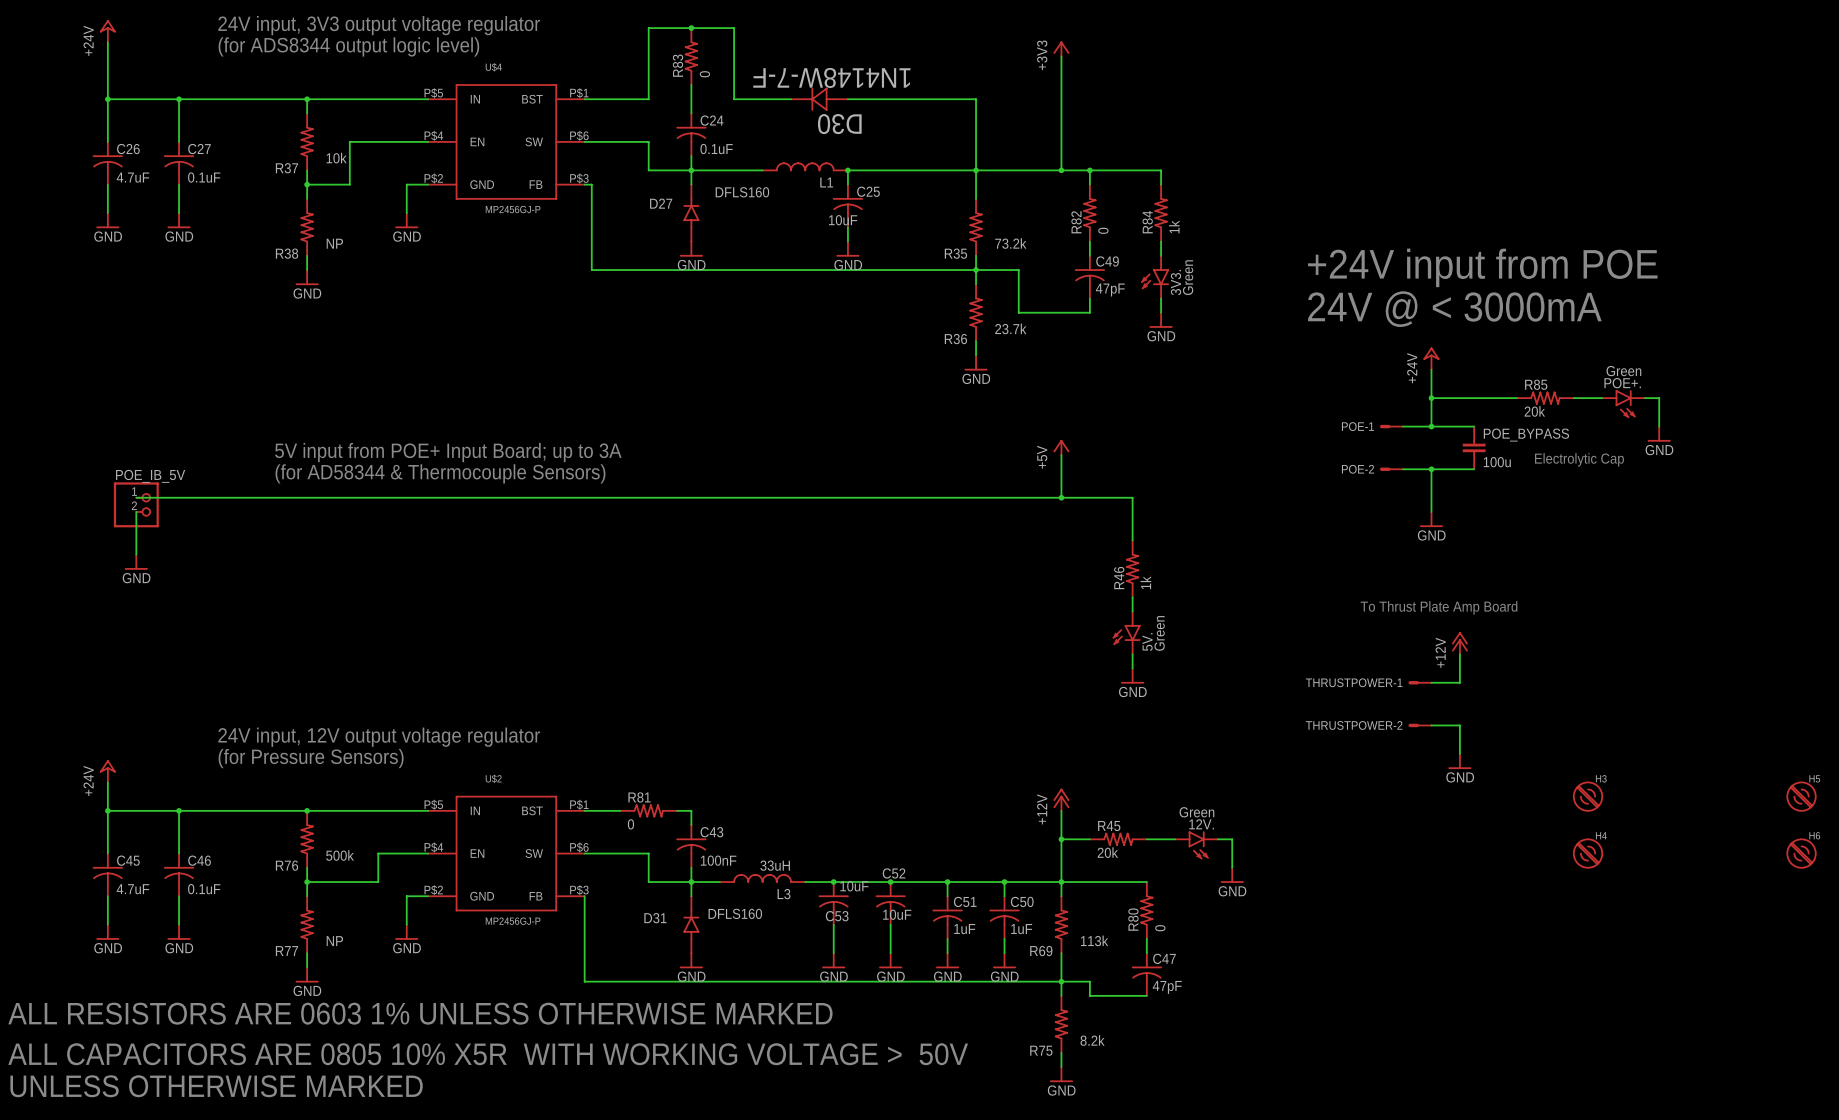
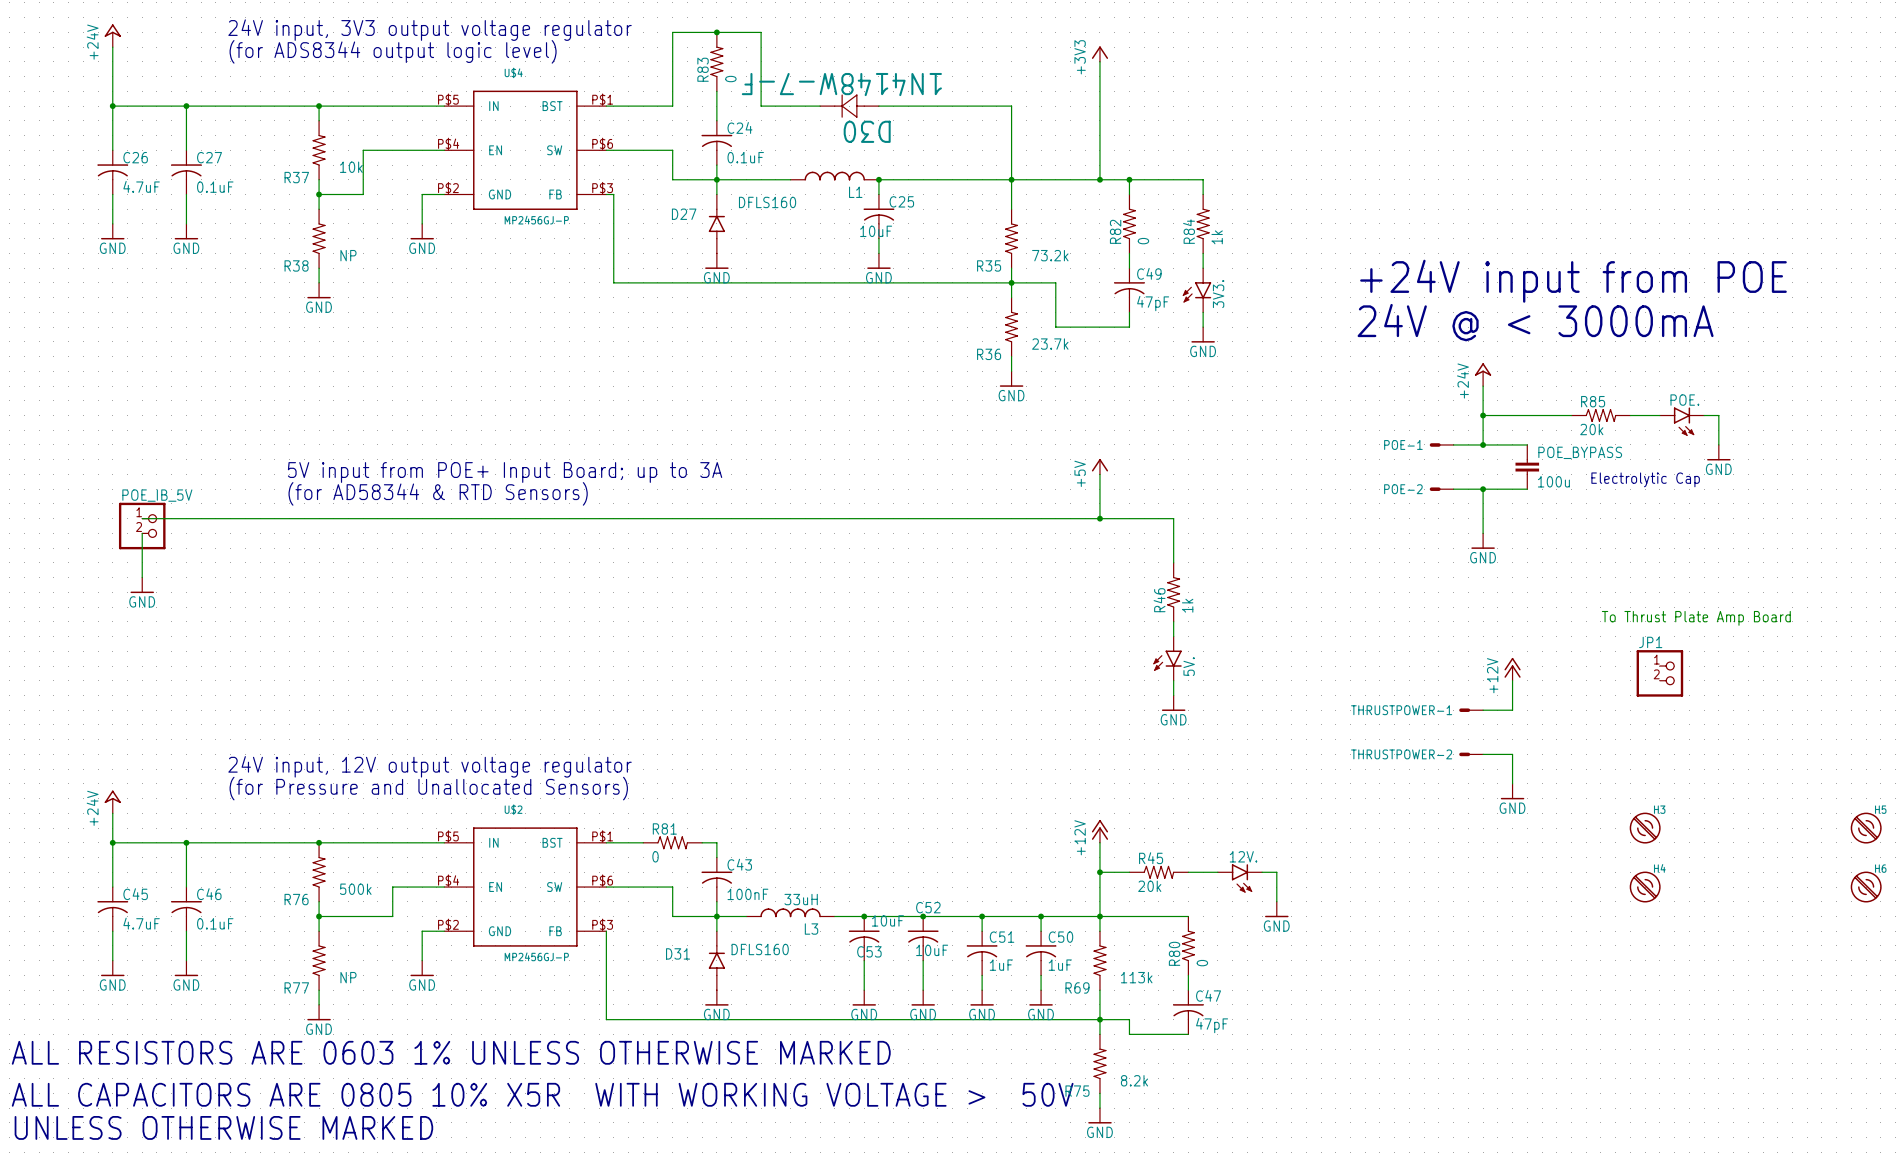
3V3. value: Green (1188, 277) -> none
POE+. value: Green (1623, 371) -> none
POE+. name: POE+. (1622, 383) -> POE. (1684, 400)
text: (for AD58344 & Thermocouple Sensors) (440, 473) -> (for AD58344 & RTD Sensors) (438, 493)
text: none -> To Thrust Plate Amp Board (1696, 618)
text: To Thrust Plate Amp Board (1439, 607) -> none
5V. value: Green (1159, 633) -> none
JP1: none -> (1659, 673)
text: (for Pressure Sensors) (311, 758) -> (for Pressure and Unallocated Sensors) (428, 788)
12V. value: Green (1196, 812) -> none

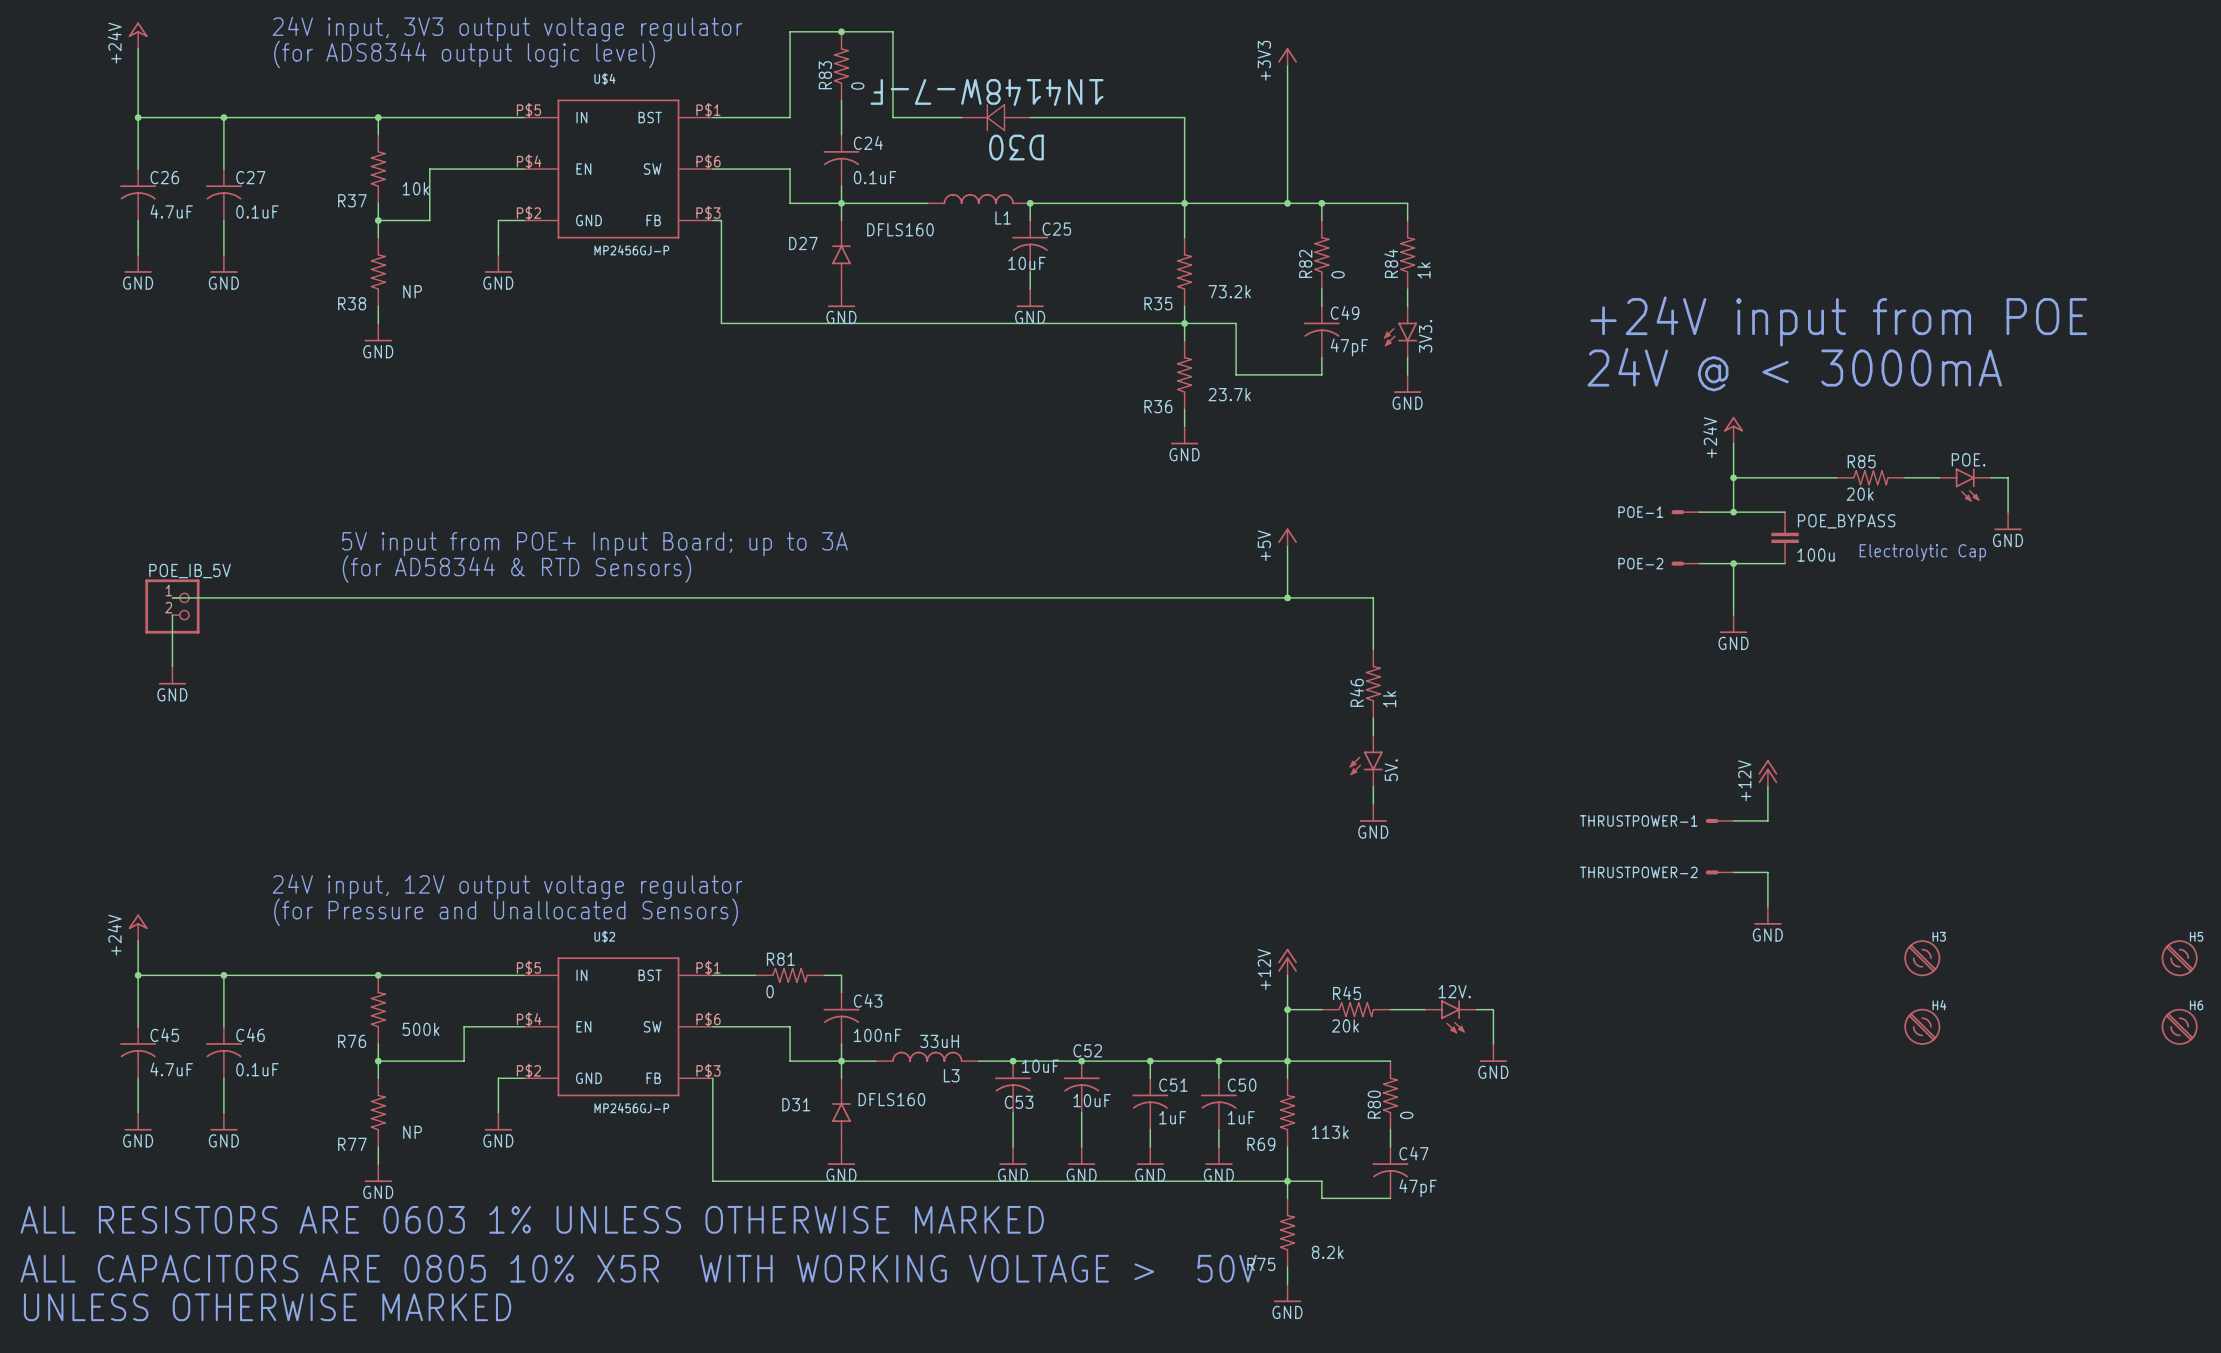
text: To Thrust Plate Amp Board (1696, 618) -> none
JP1: (1659, 673) -> none

